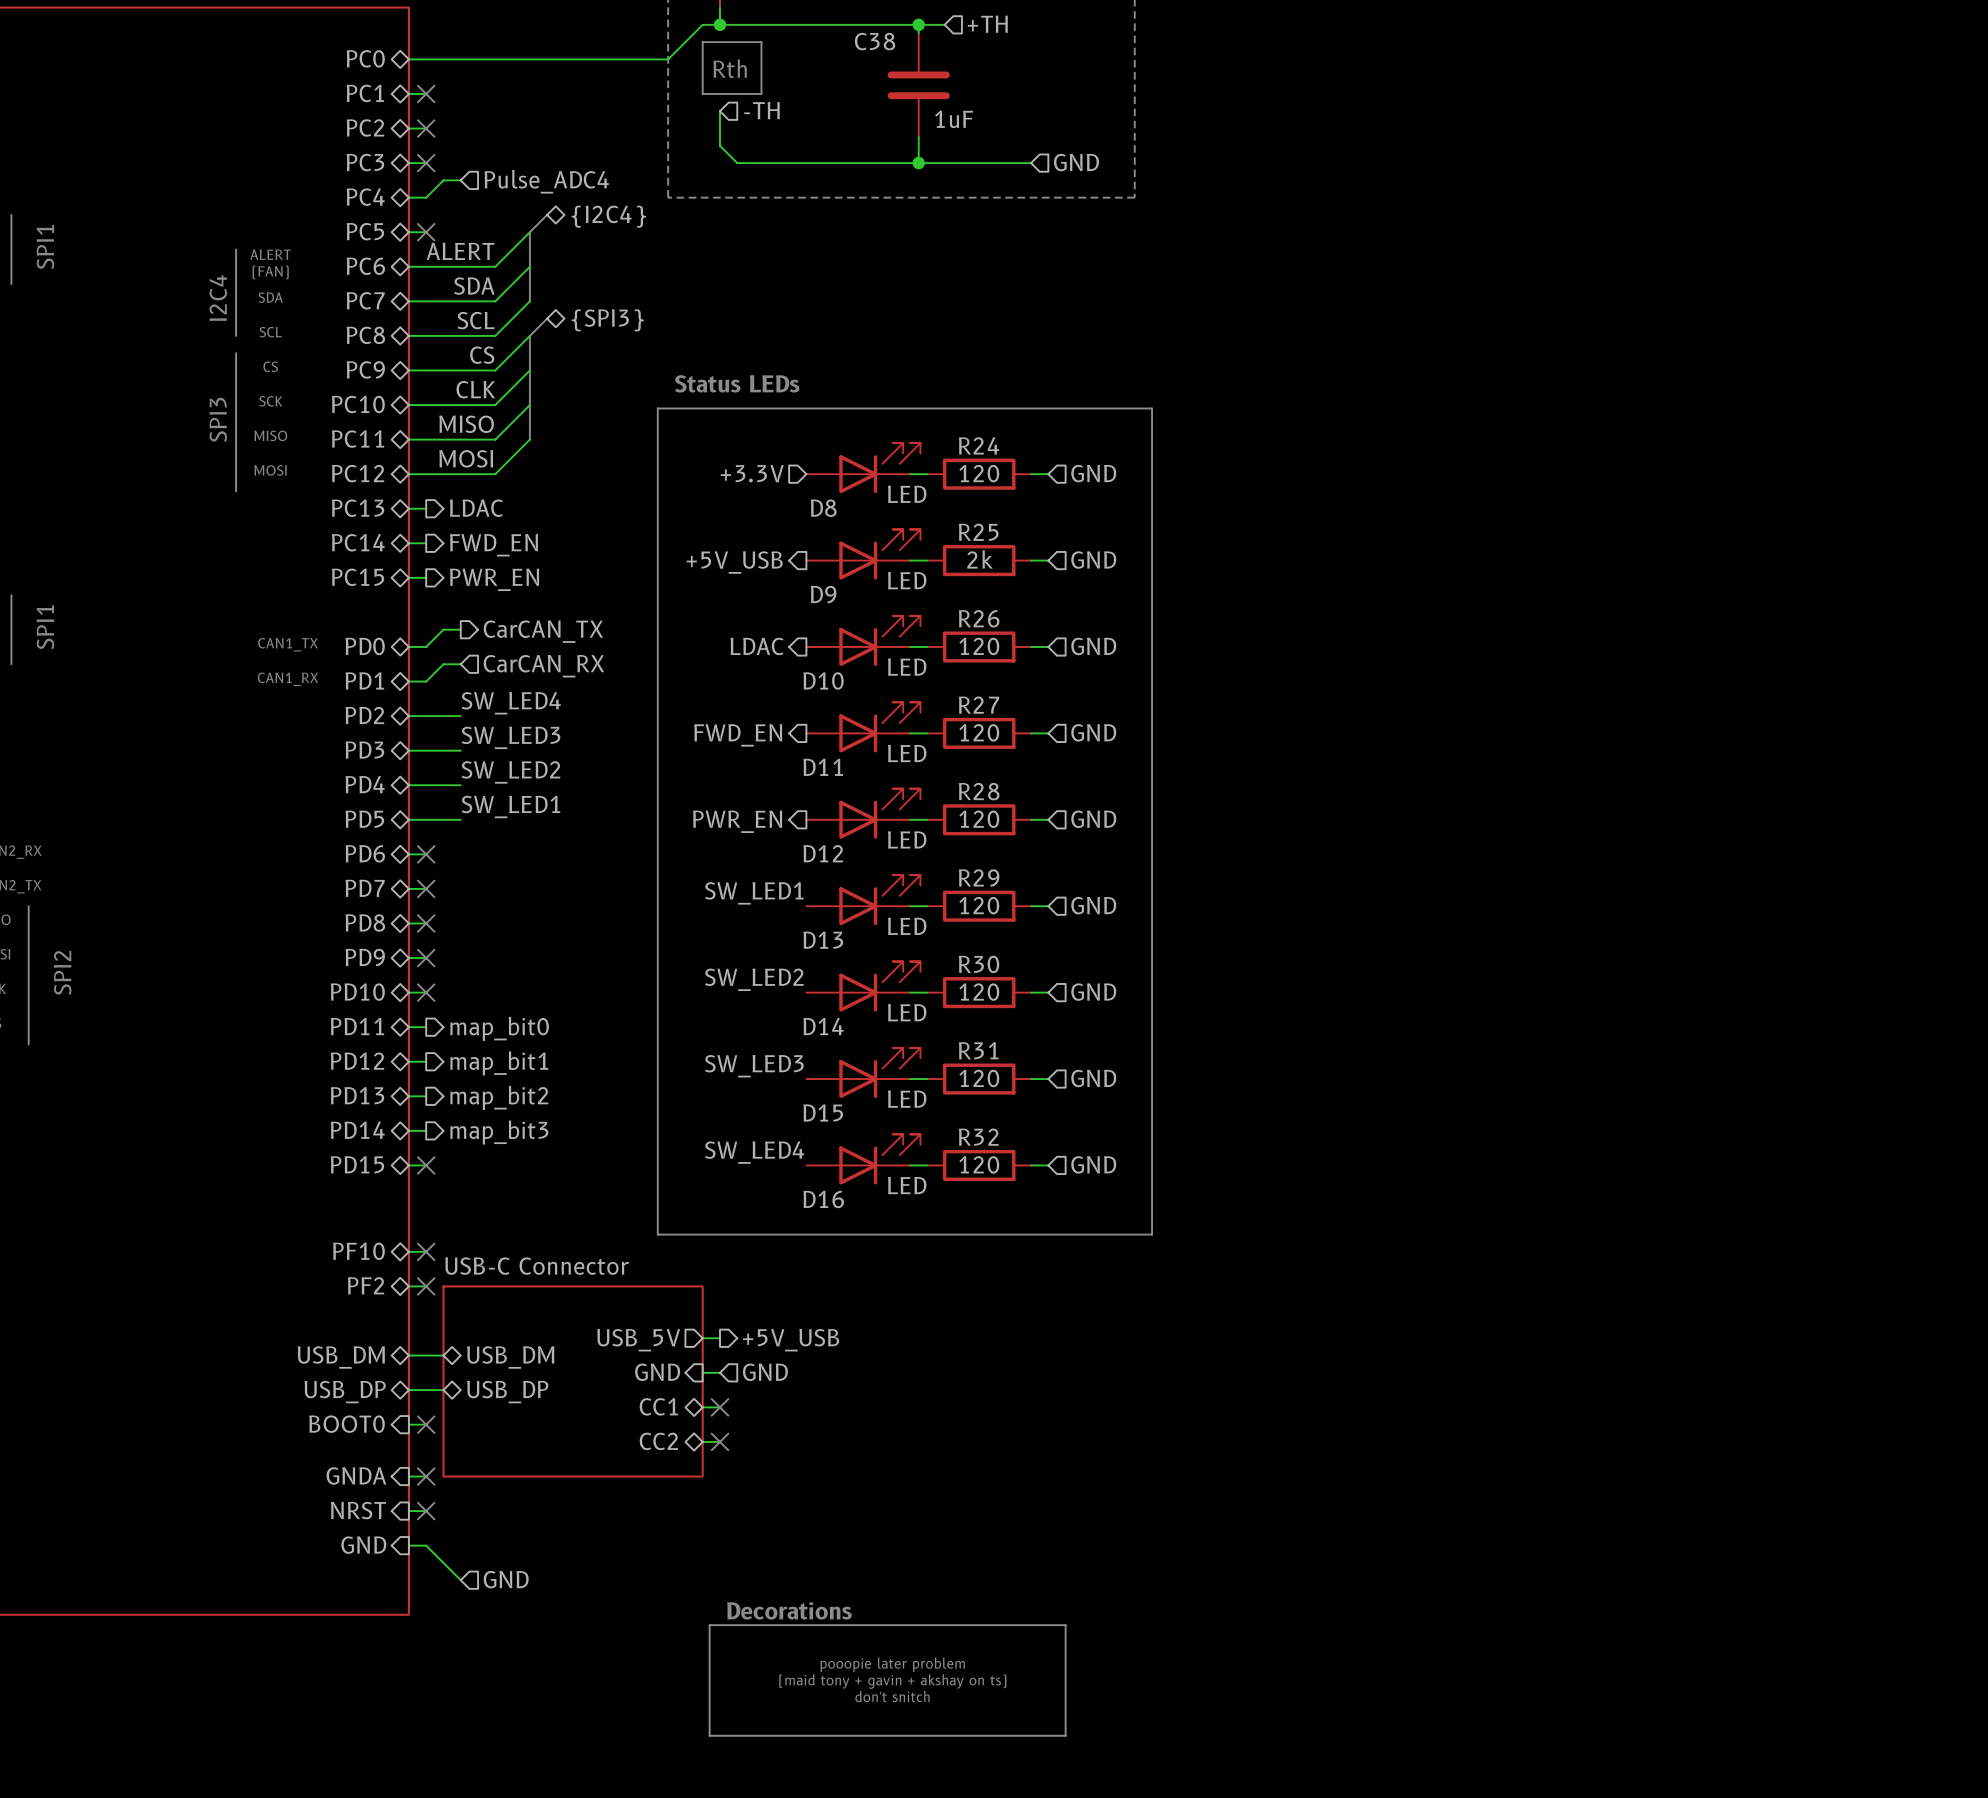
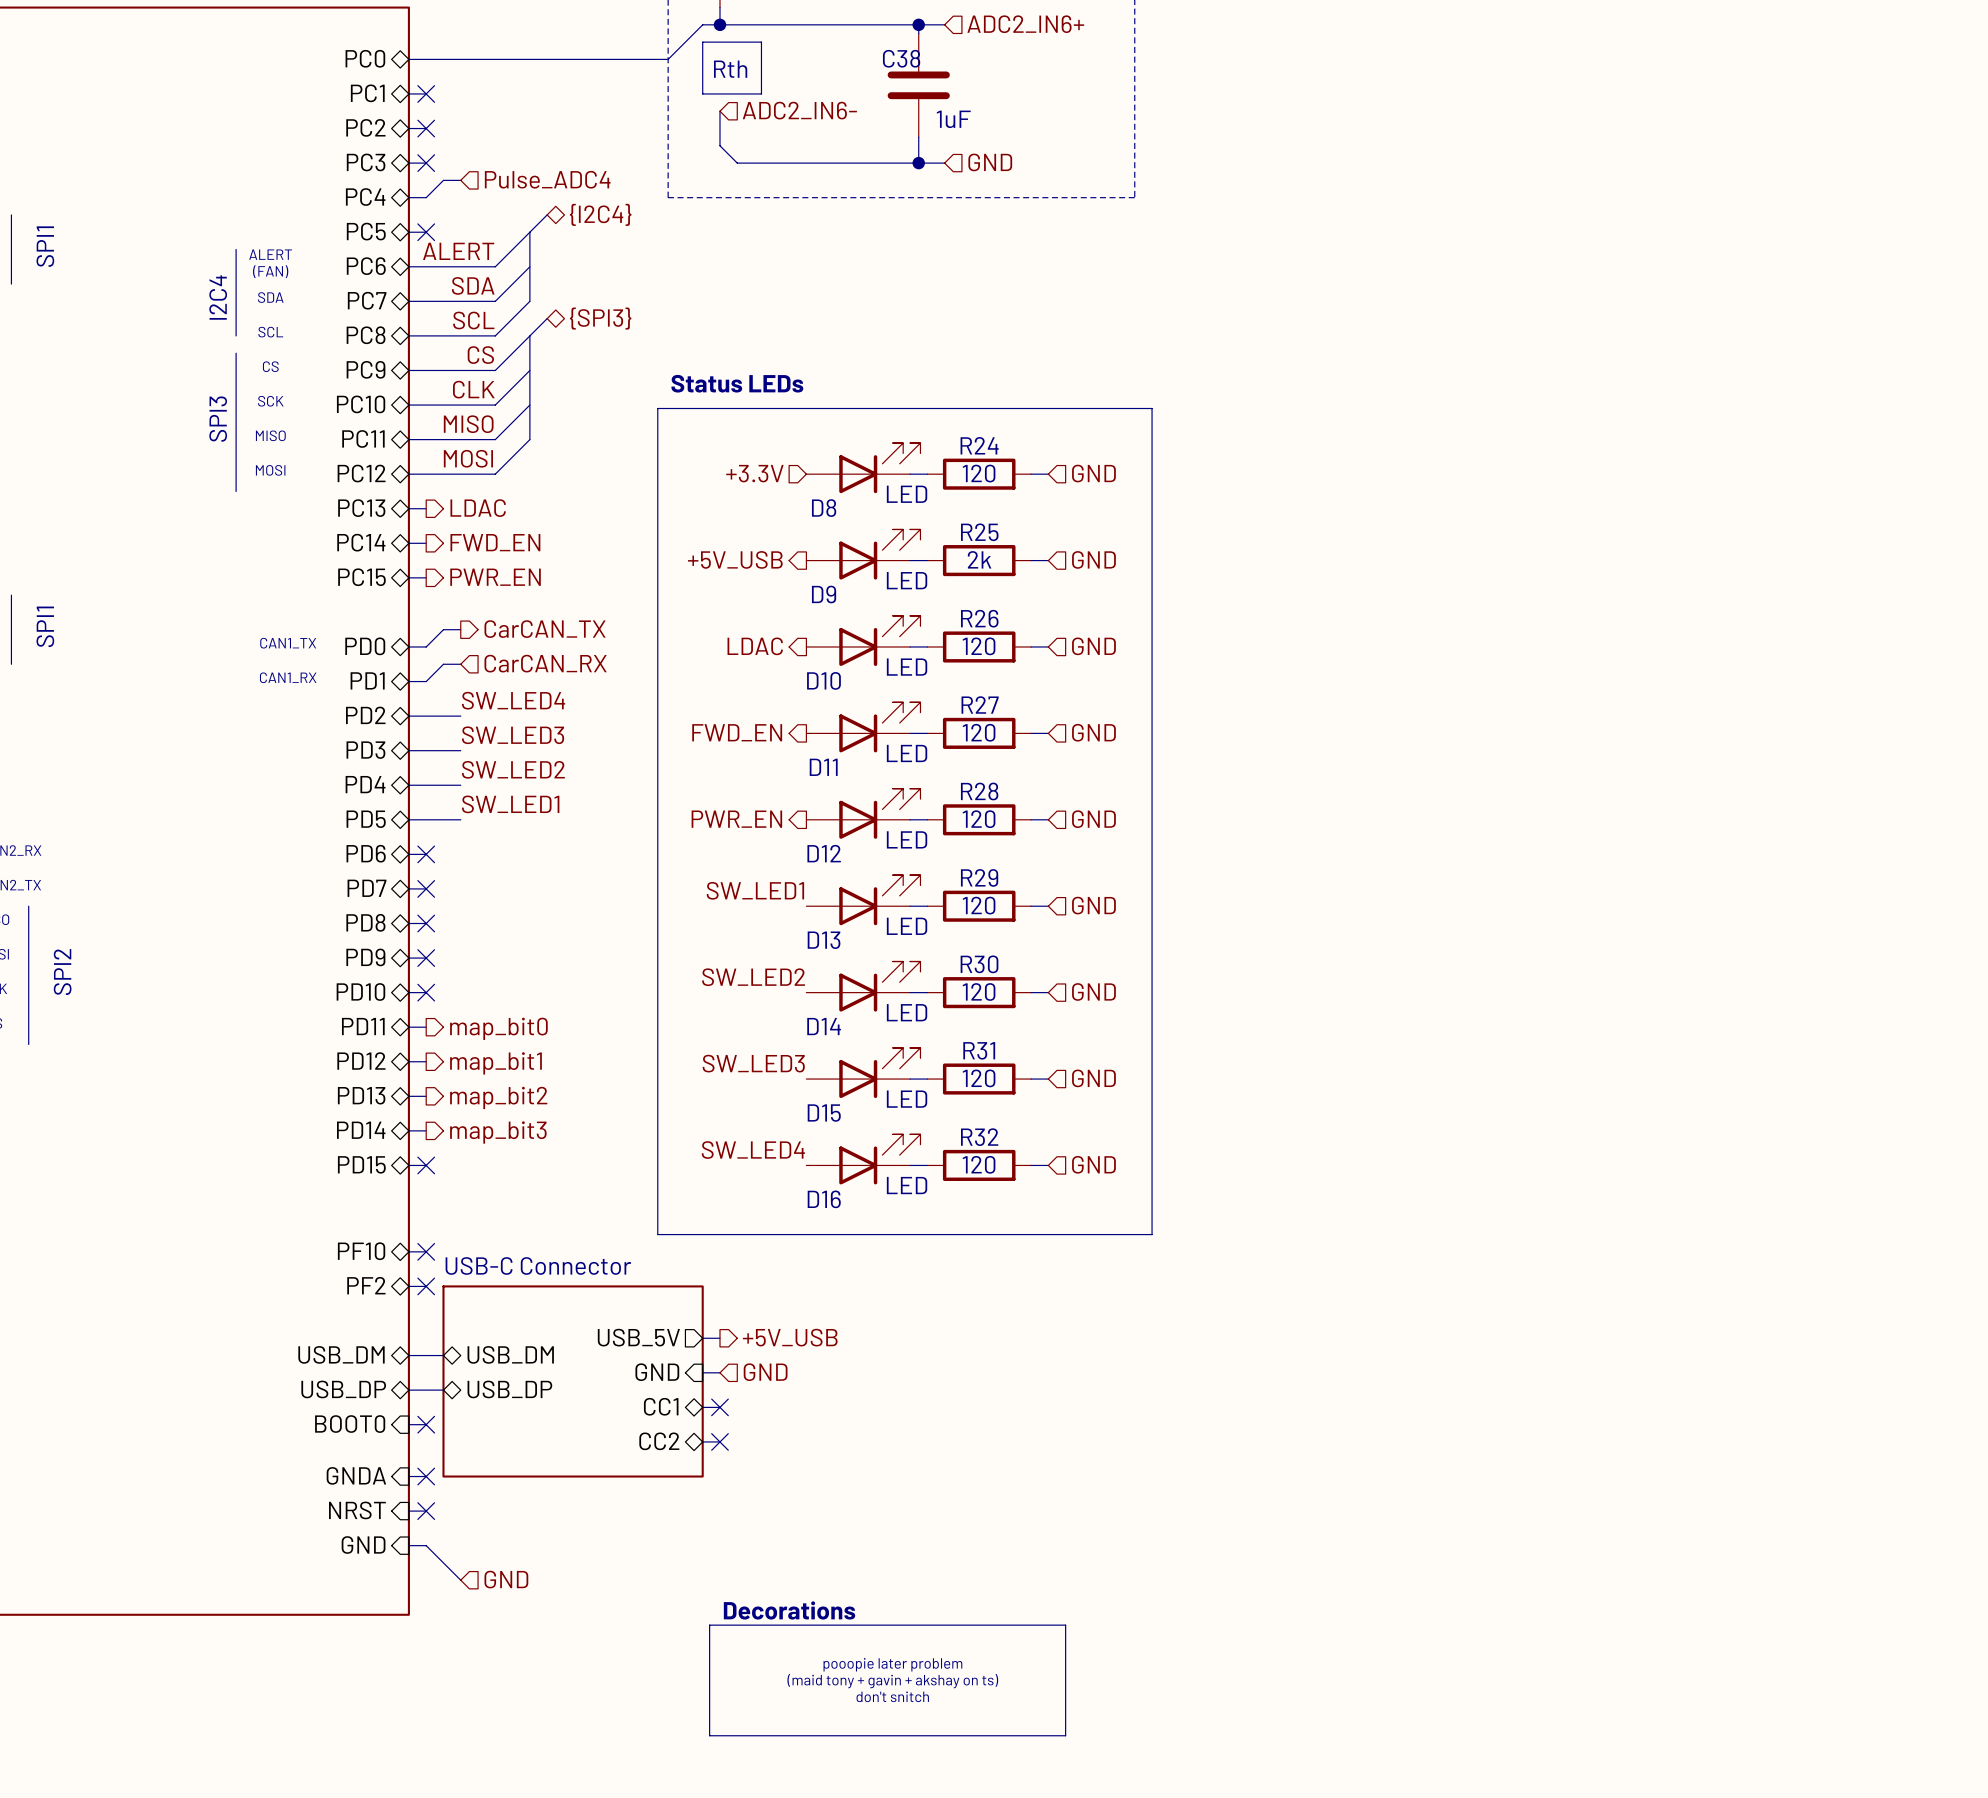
hierarchical label: +TH (987, 24) -> ADC2_IN6+ (1025, 24)
C38 name position: C38 (875, 41) -> C38 (901, 58)
hierarchical label: -TH (761, 110) -> ADC2_IN6- (799, 110)
hierarchical label position: GND (1076, 162) -> GND (990, 162)
wire: (944, 163) (1031, 163) -> none

